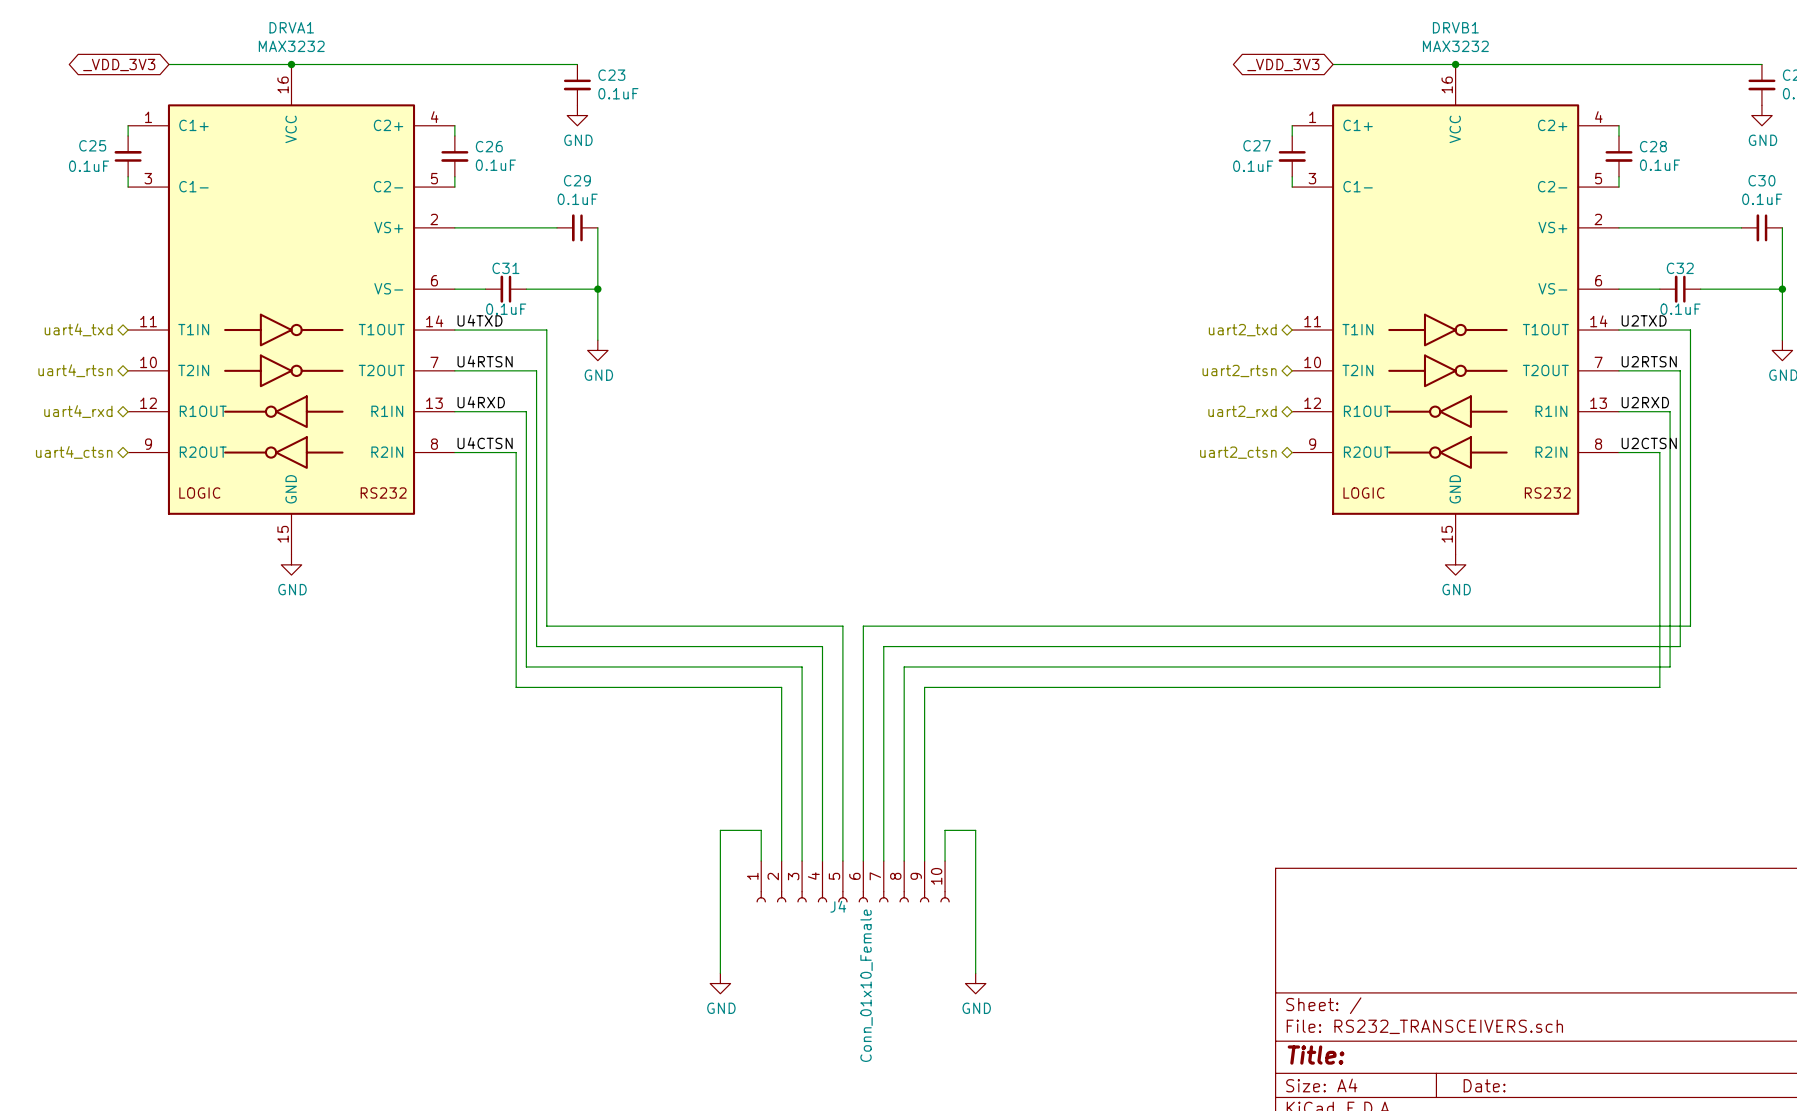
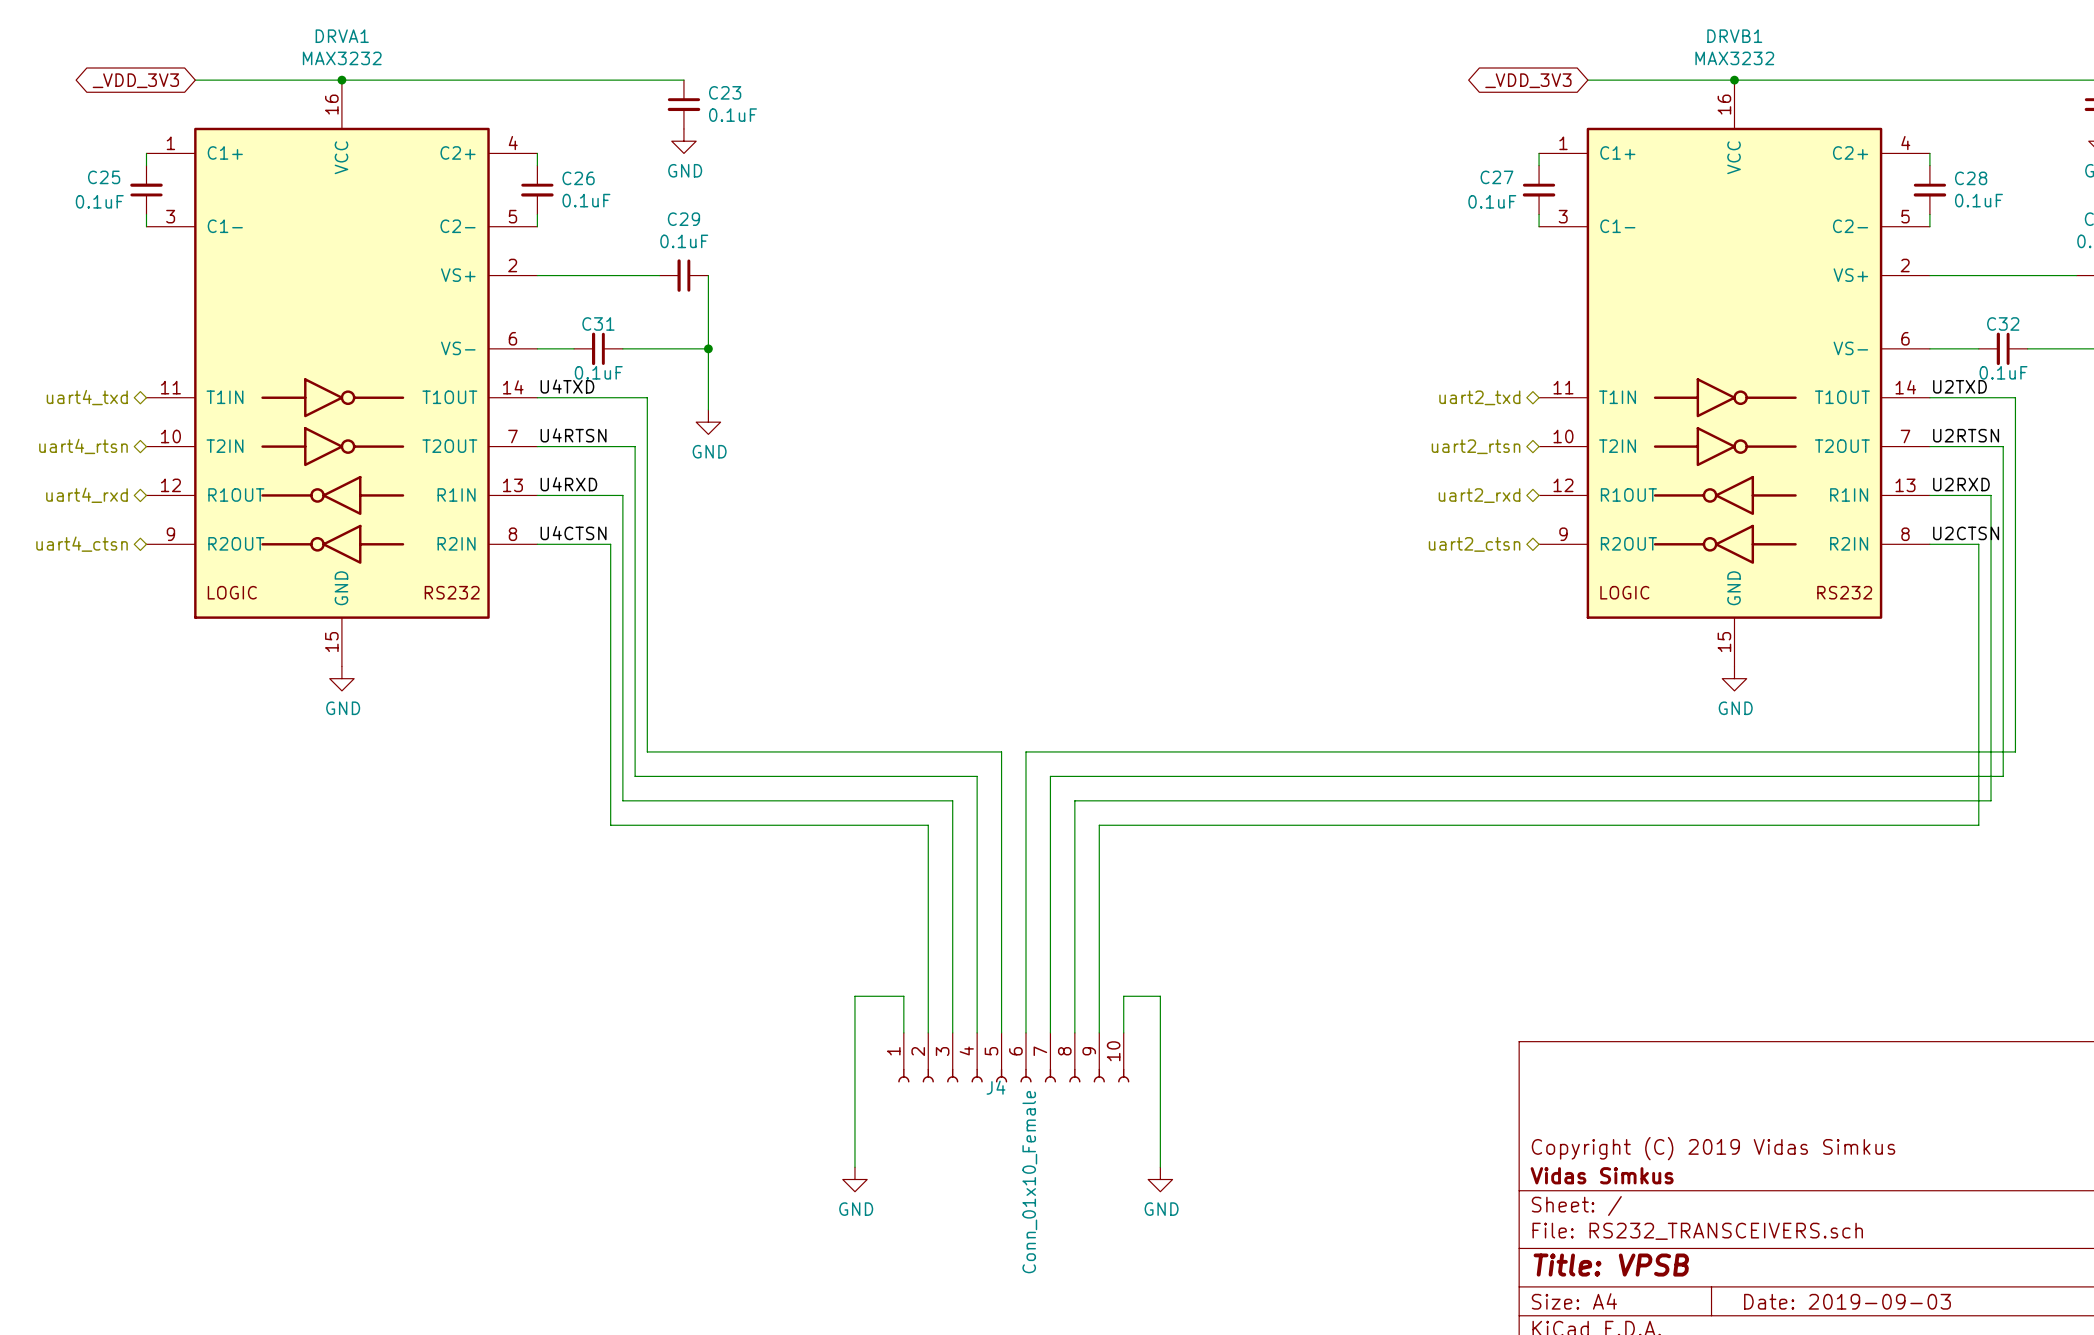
title block: none -> Copyright (C) 2019 Vidas Simkus (1713, 1148)
title block: none -> Vidas Simkus (1602, 1175)
title block: Title: (1316, 1055) -> Title: VPSB (1611, 1265)
title block: Date: (1484, 1085) -> Date: 2019-09-03 (1847, 1301)

